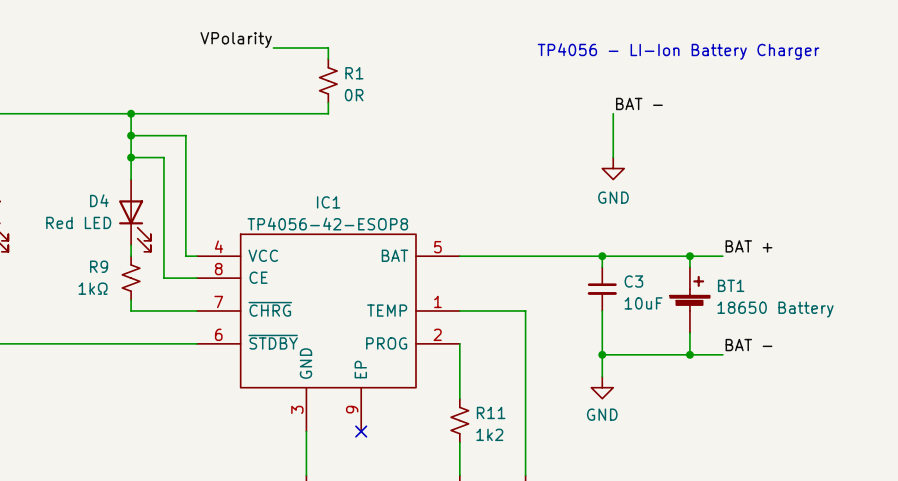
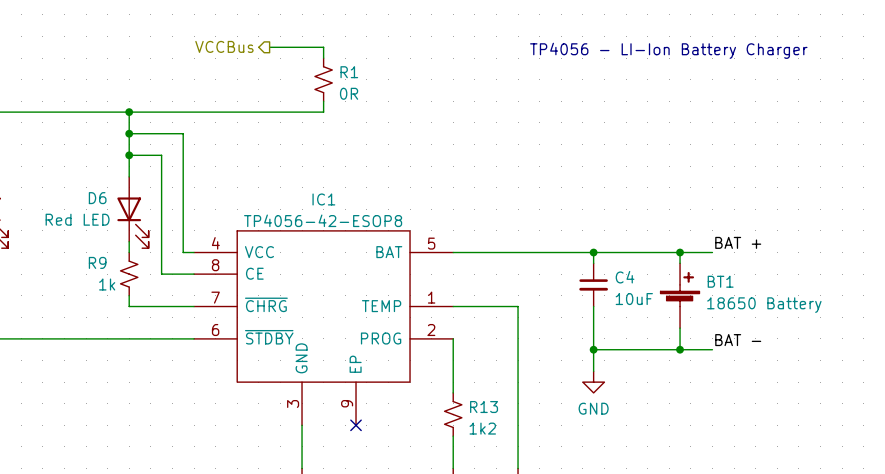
label: VPolarity (236, 40) -> none
hierarchical label: none -> VCCBus (224, 46)
label: BAT - (639, 103) -> none
wire: (613, 113) (613, 157) -> none
power symbol: GND (613, 168) -> none
D4 name: D4 (99, 200) -> D6 (97, 198)
C3 name: C3 (633, 281) -> C4 (625, 277)
R9 value: 1kΩ (93, 288) -> 1k (107, 284)
R11 name: R11 (491, 412) -> R13 (484, 407)

